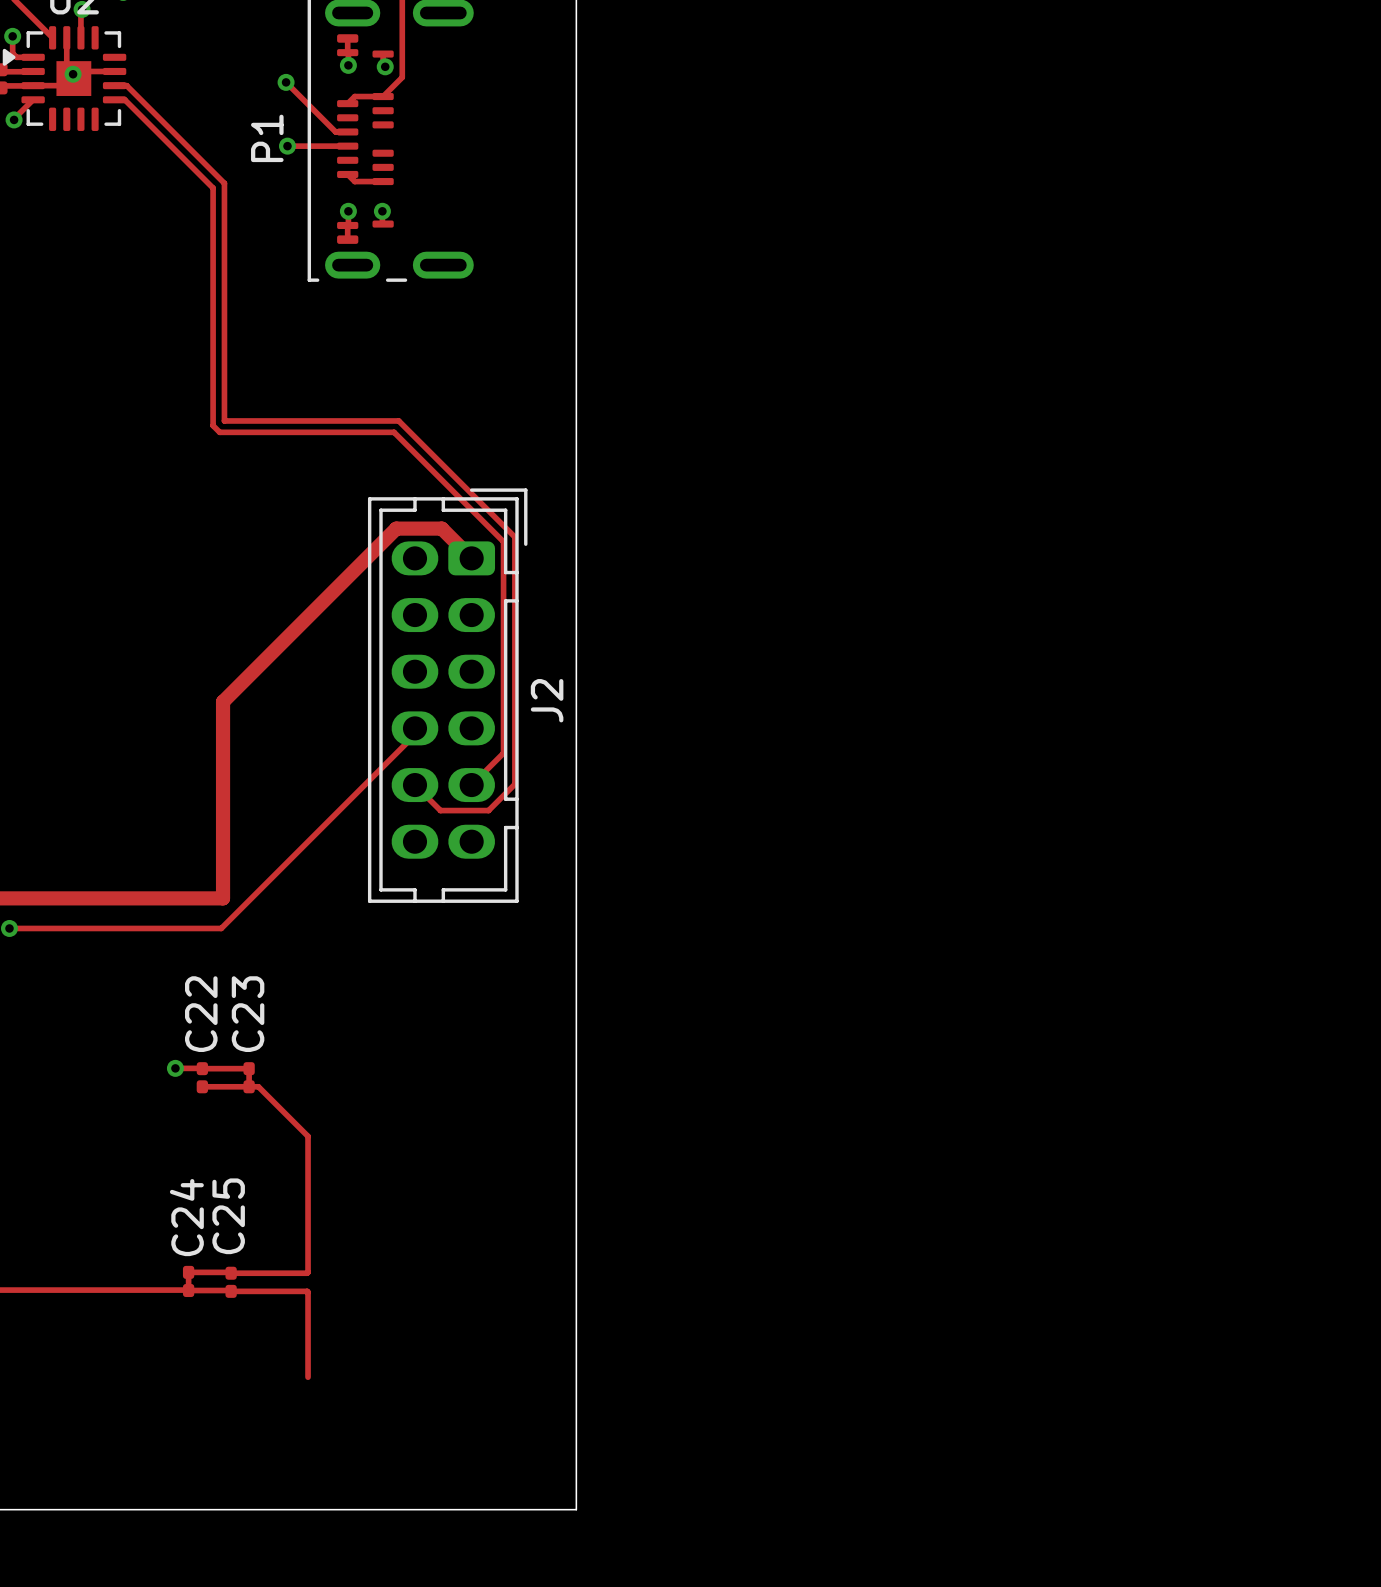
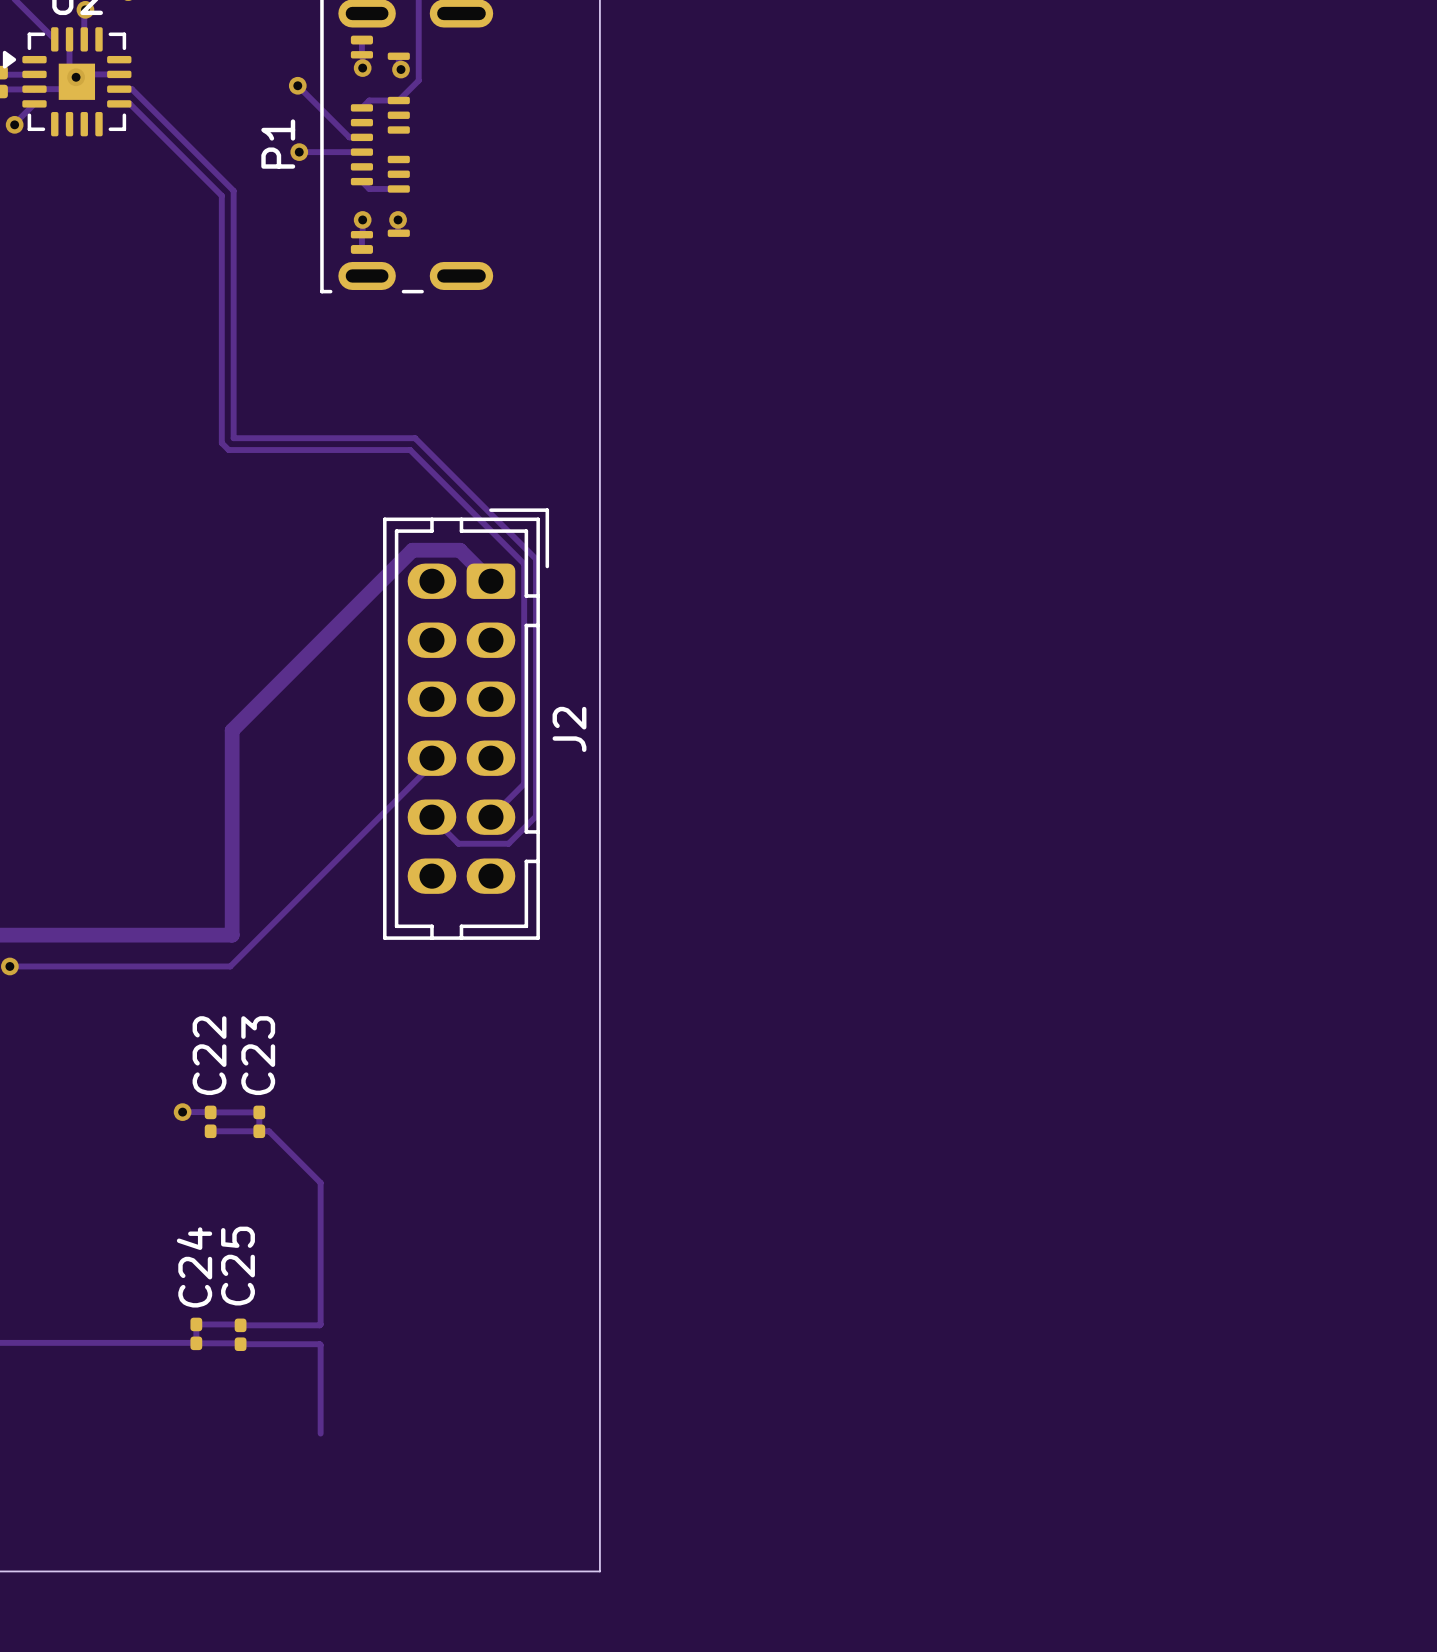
track: (12, 36) (12, 53) (16, 57) (33, 57) -> none
via: (12, 36) -> none

